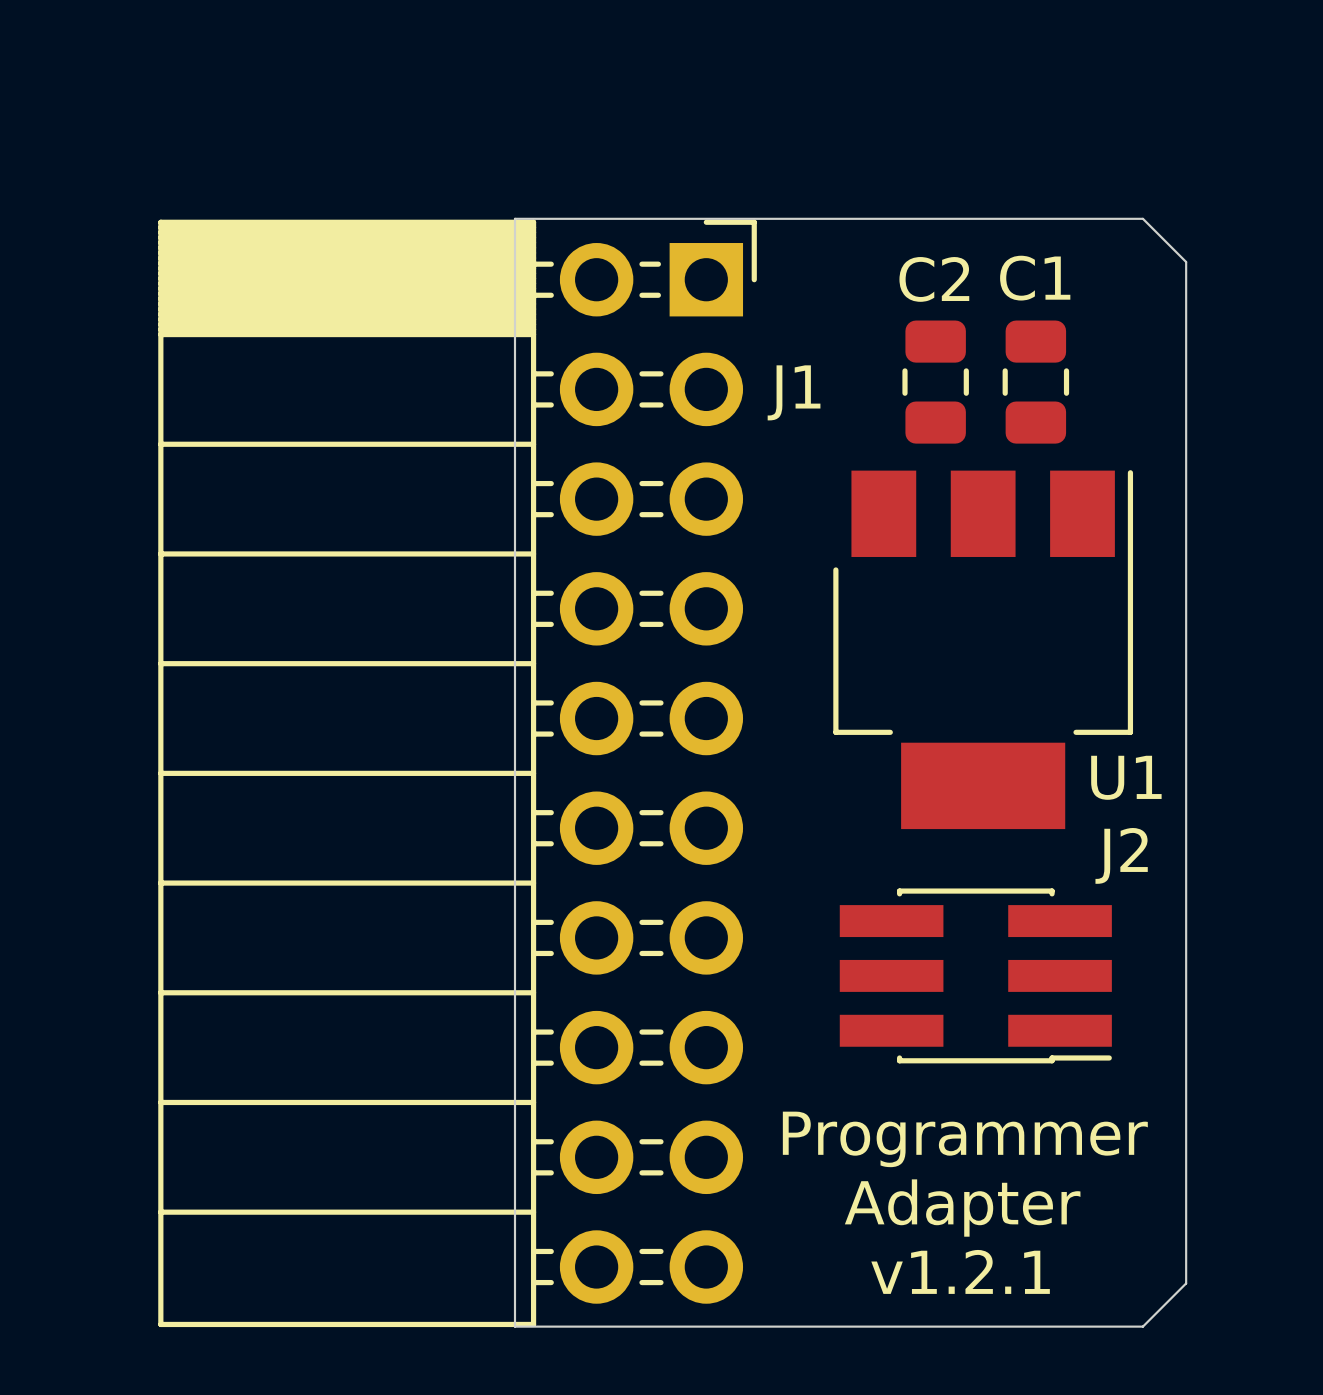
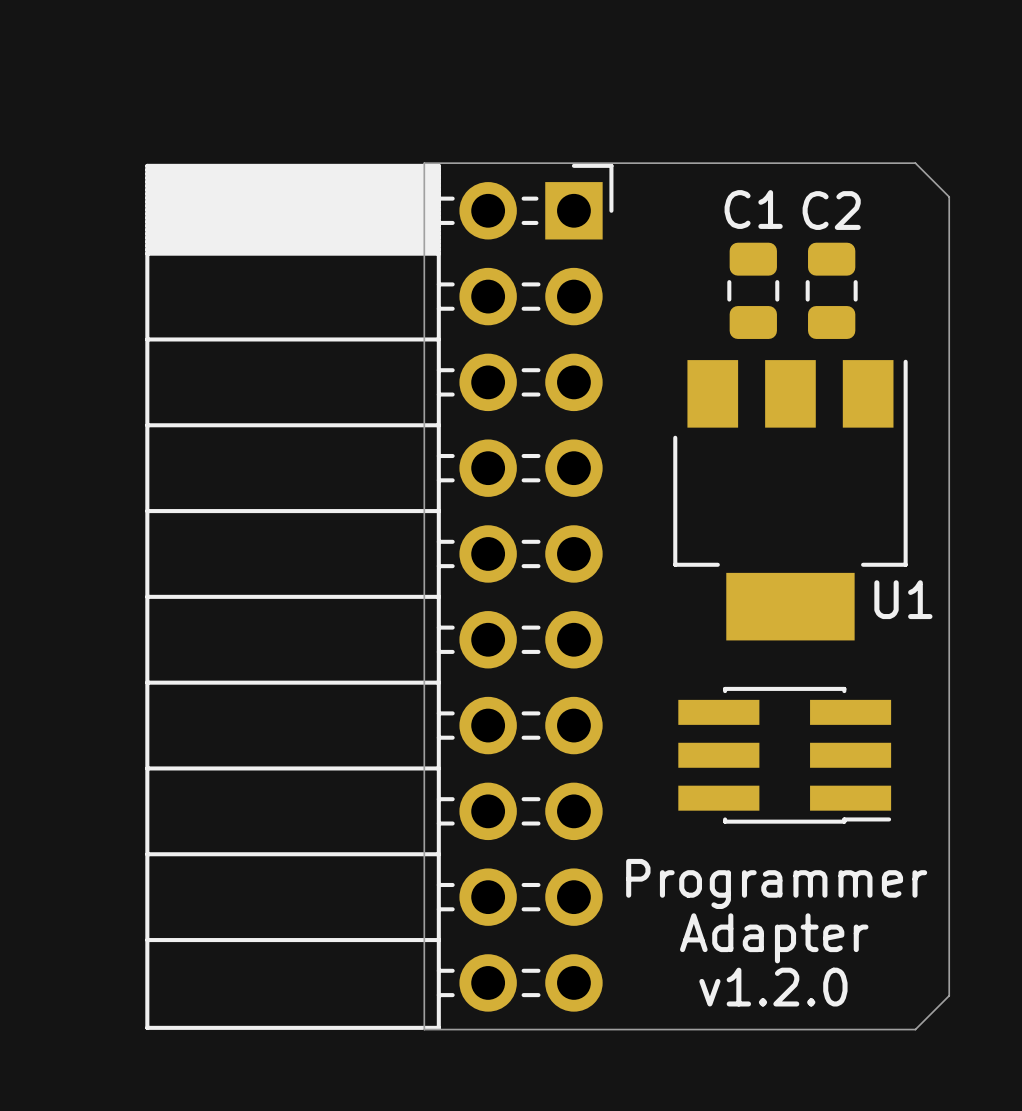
C1 name: C1 (1035, 278) -> C2 (831, 210)
C2 name: C2 (934, 279) -> C1 (753, 209)
J1 name: J1 (794, 392) -> none
J2 name: J2 (1121, 855) -> none
text: v1.2.1 (960, 1271) -> v1.2.0 (773, 987)

